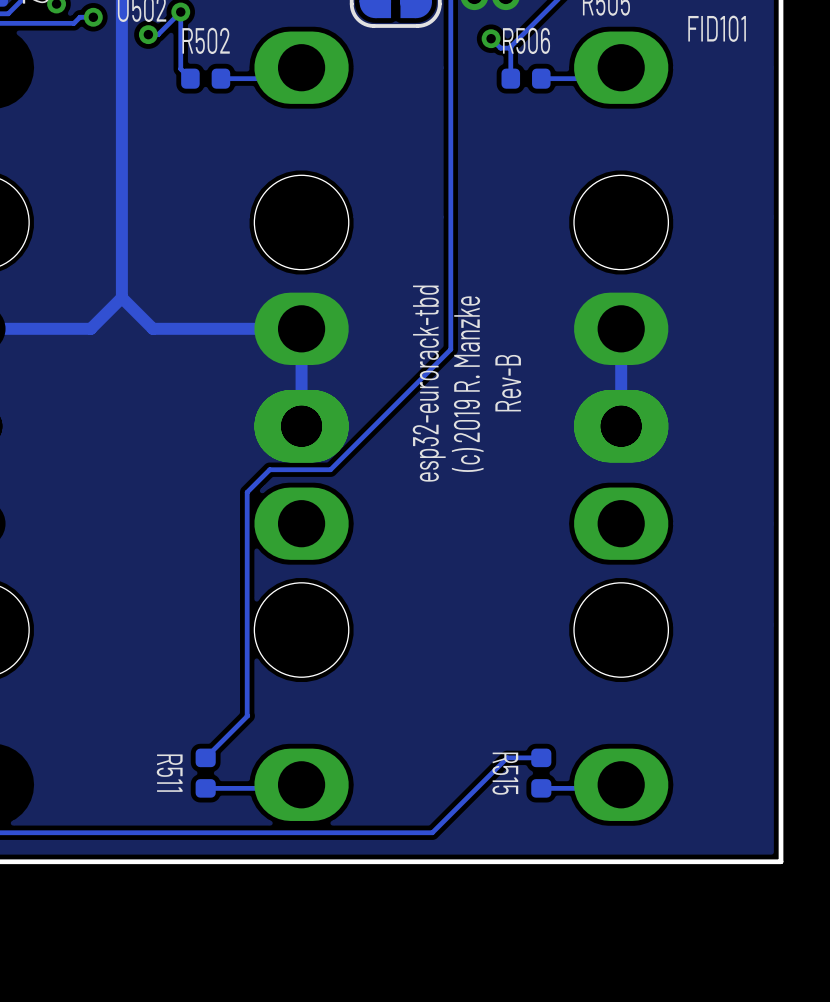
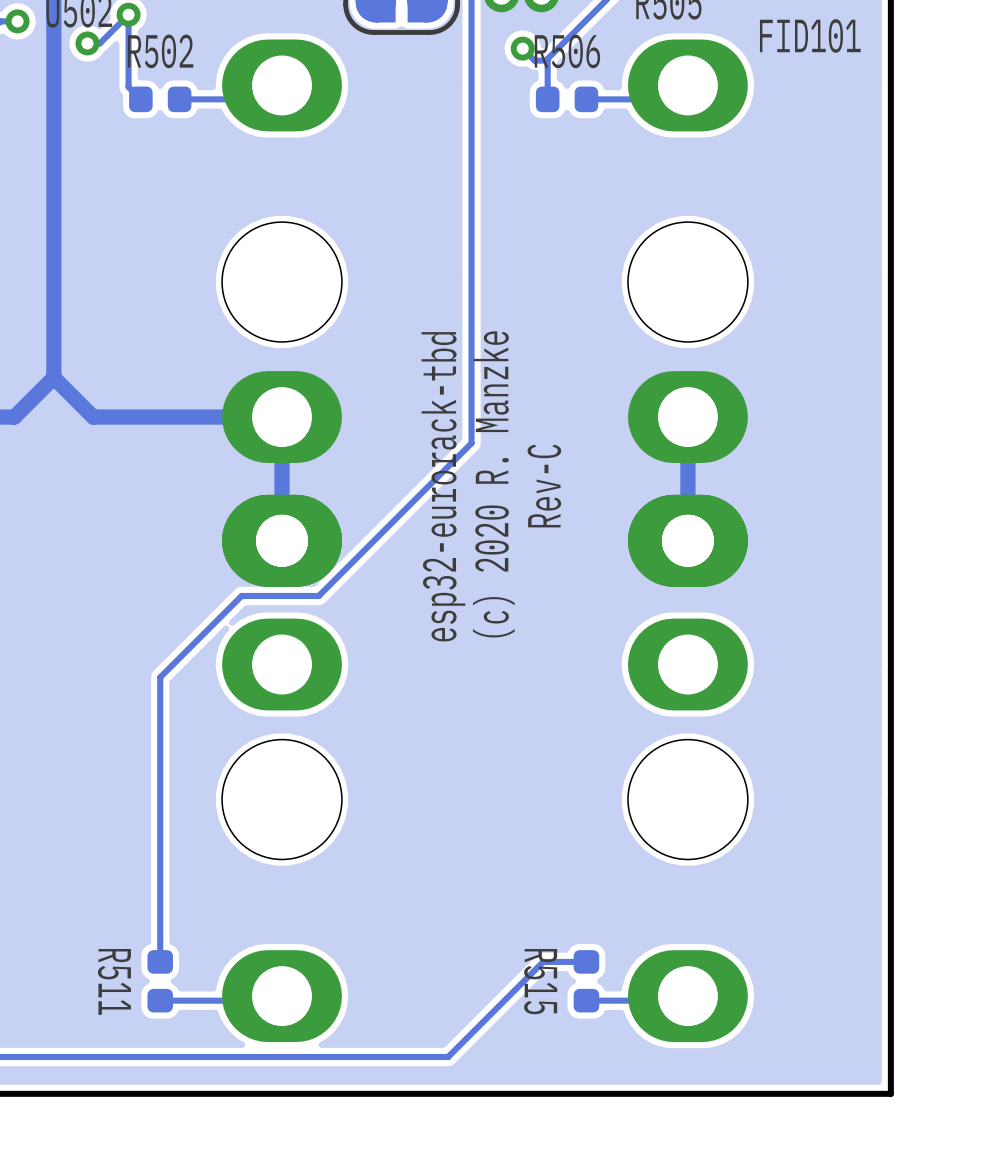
text: Rev-B (508, 383) -> Rev-C (544, 485)
text: (c) 2019 R. Manzke (467, 384) -> (c) 2020 R. Manzke (493, 484)
track: (247, 492) (247, 715) (205, 757) -> (212, 624) (160, 677) (160, 961)

